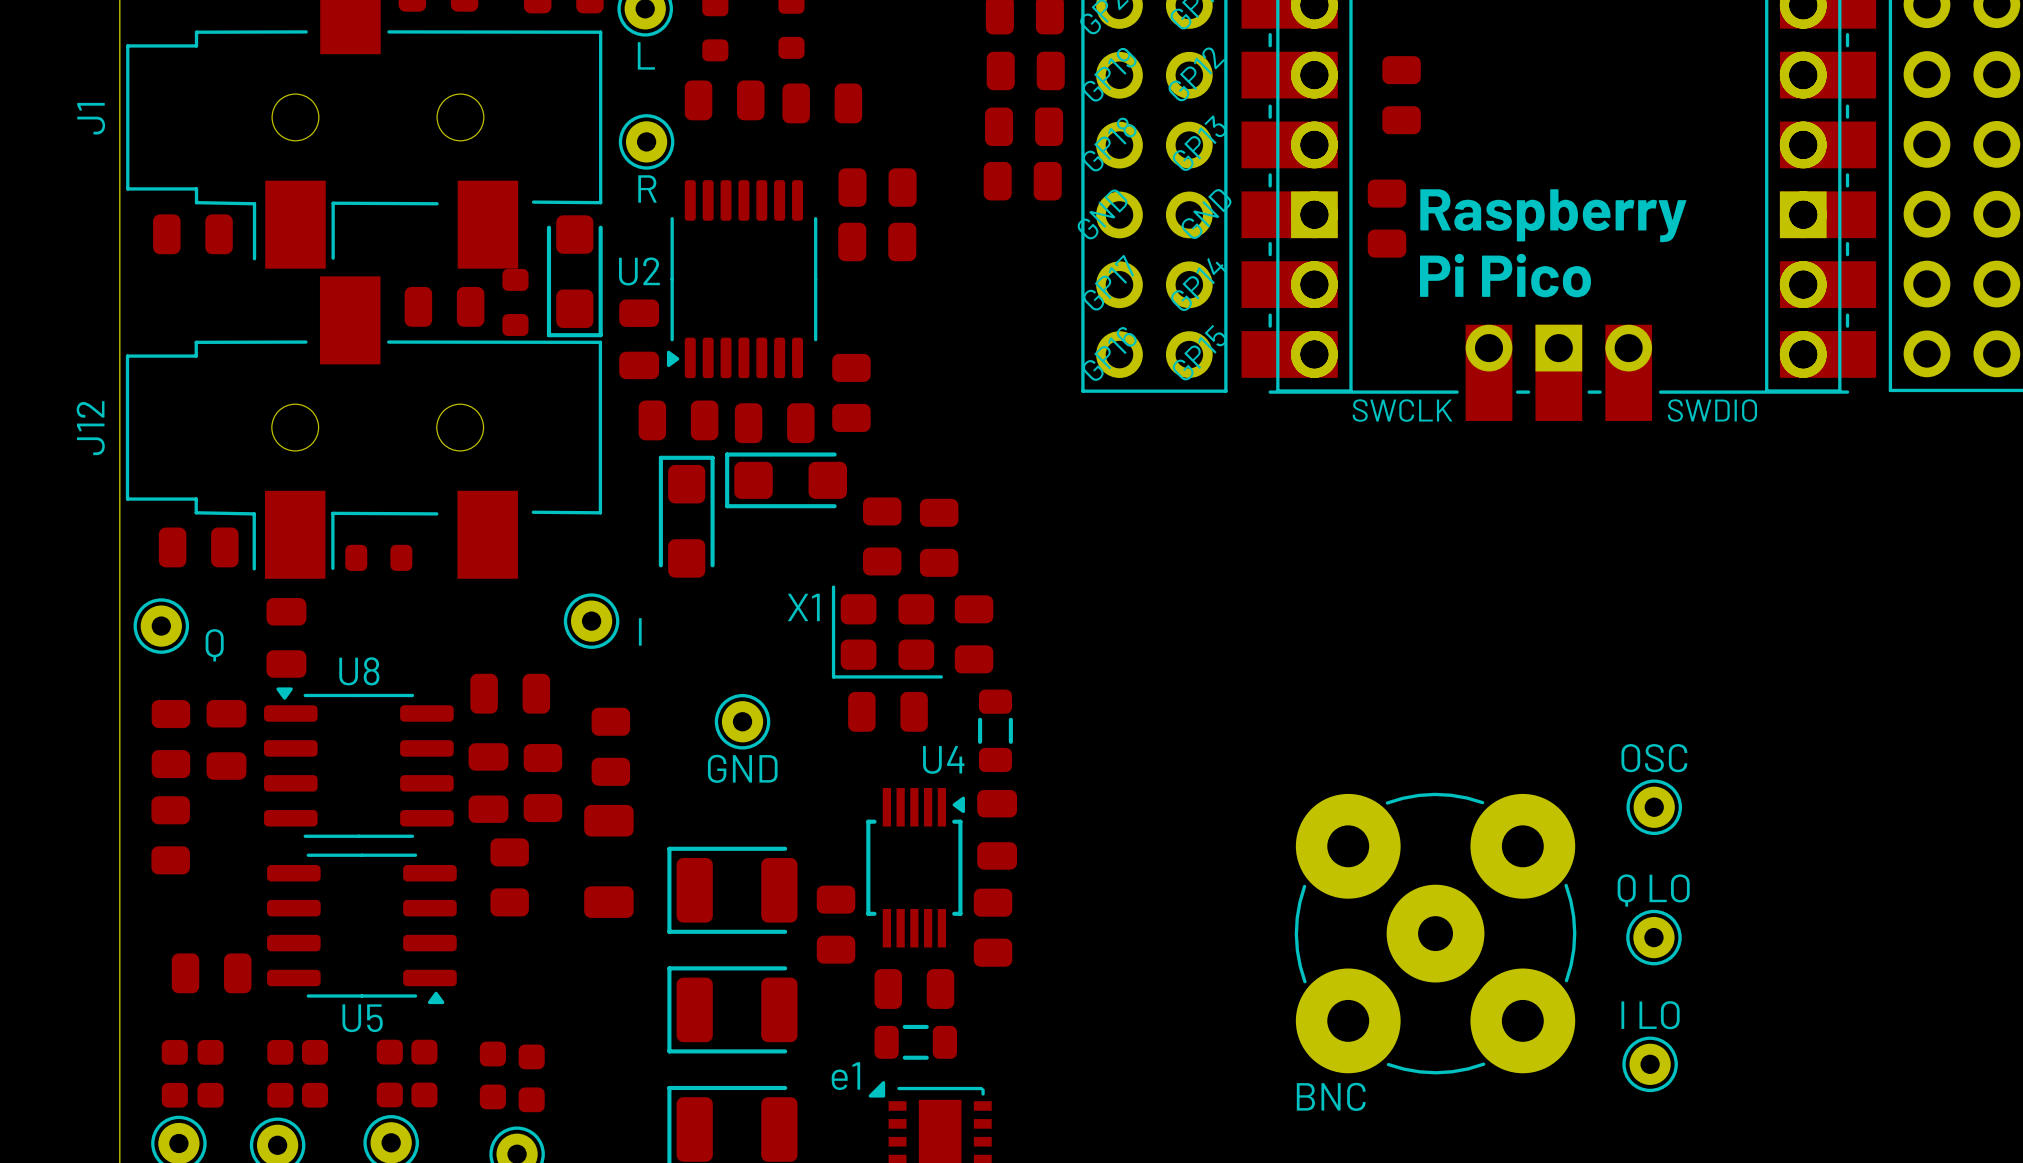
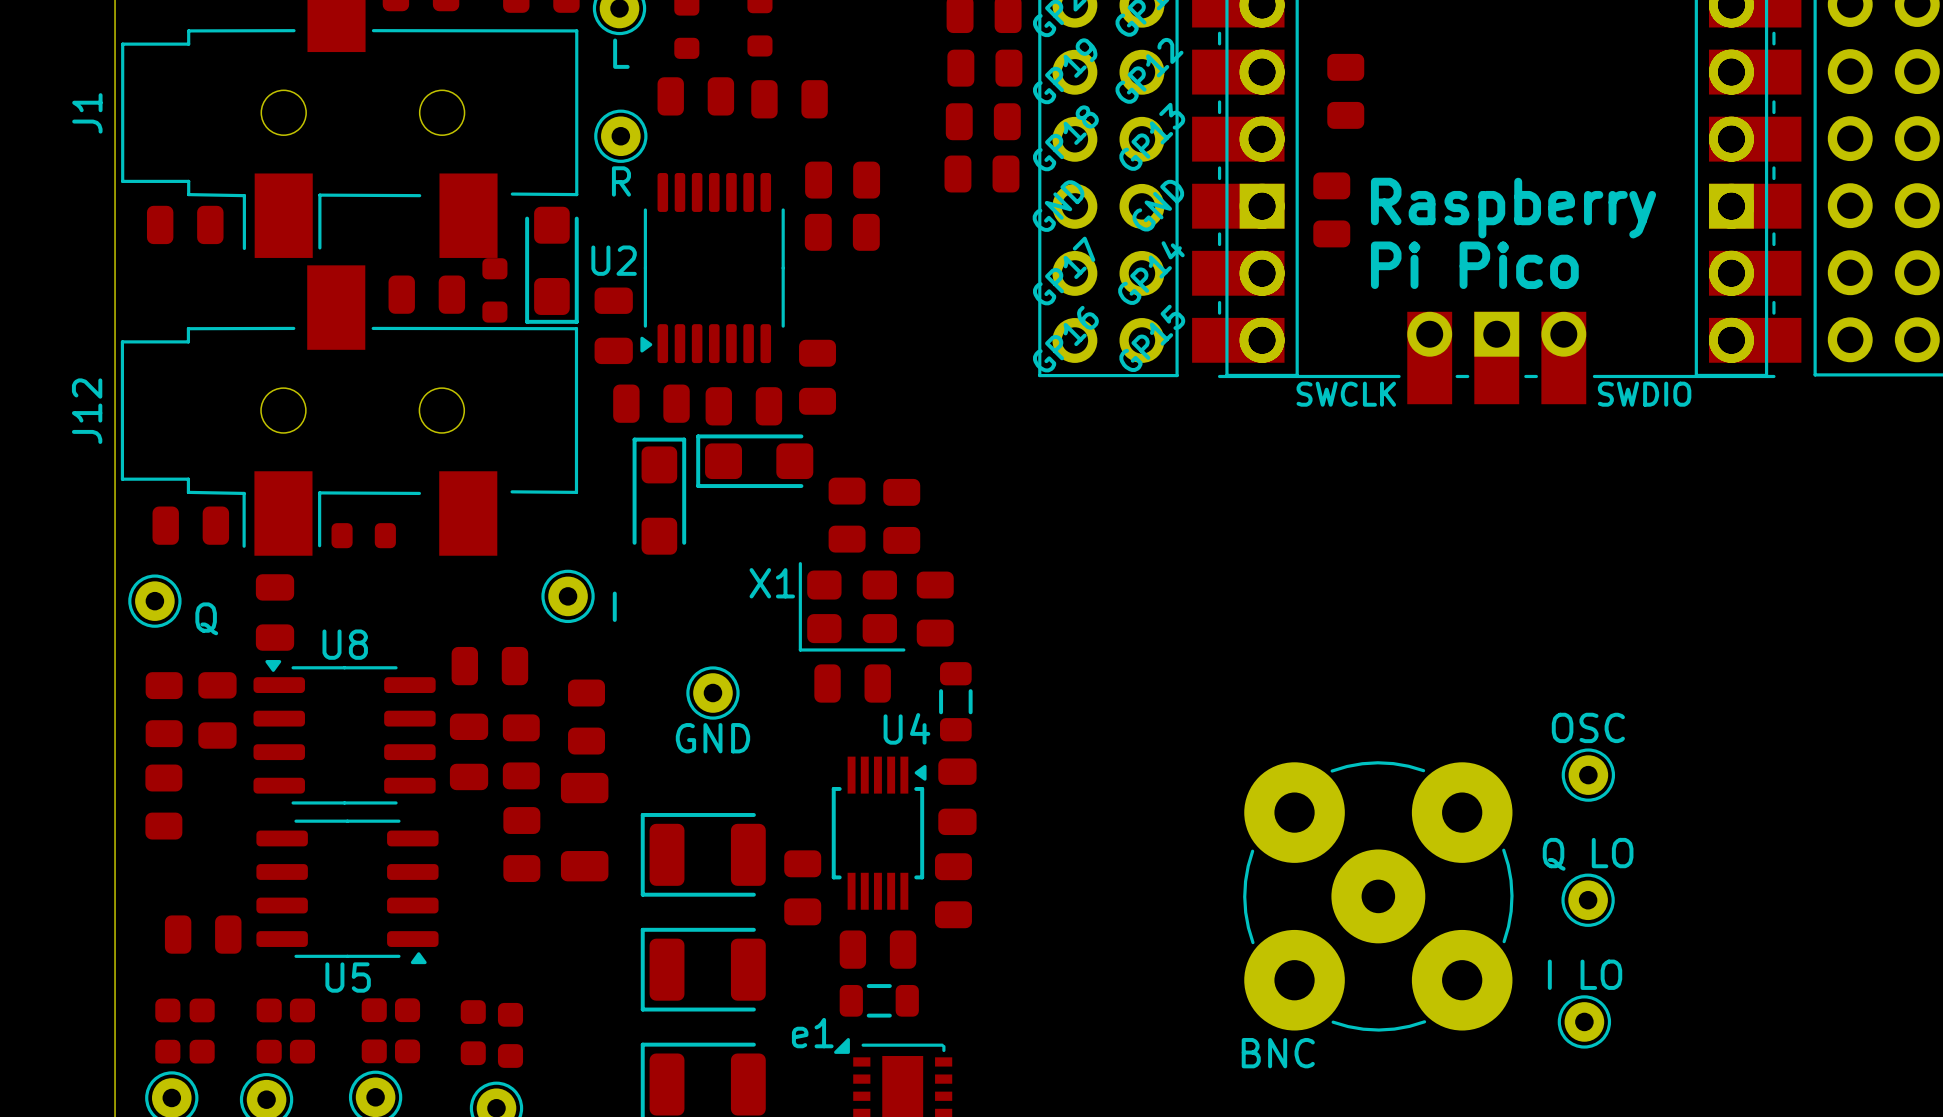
part position: (509, 877) -> (521, 844)

